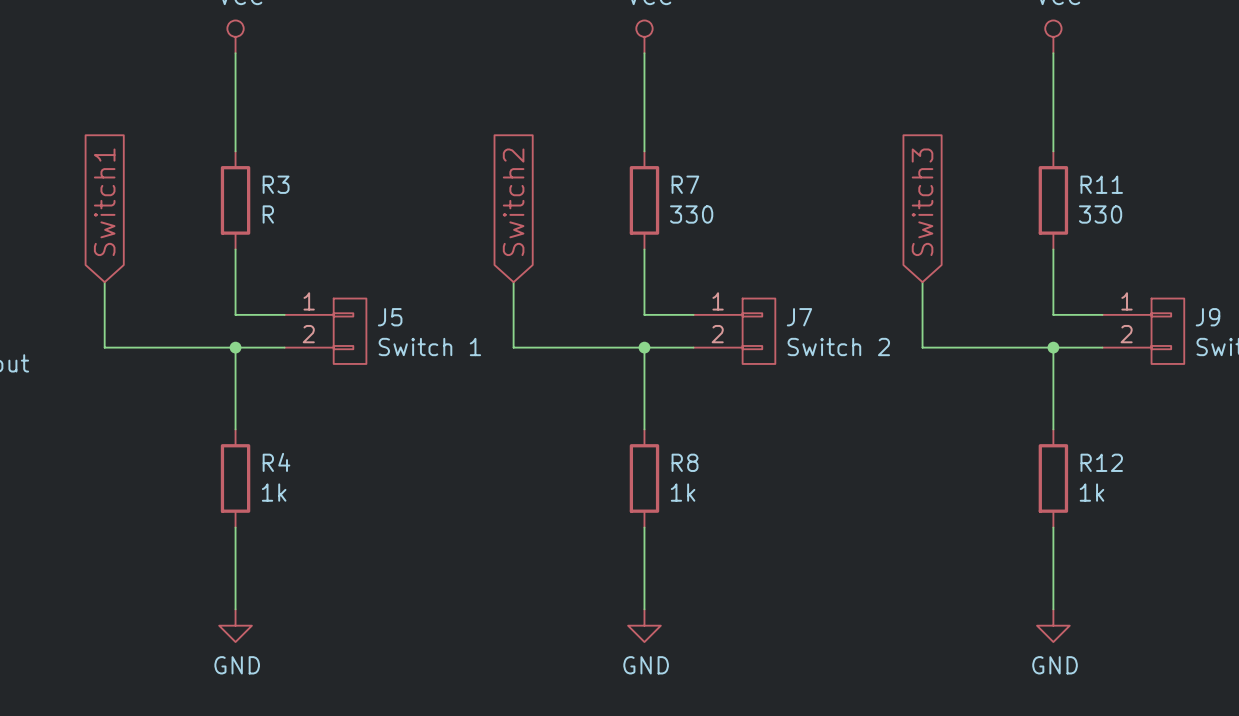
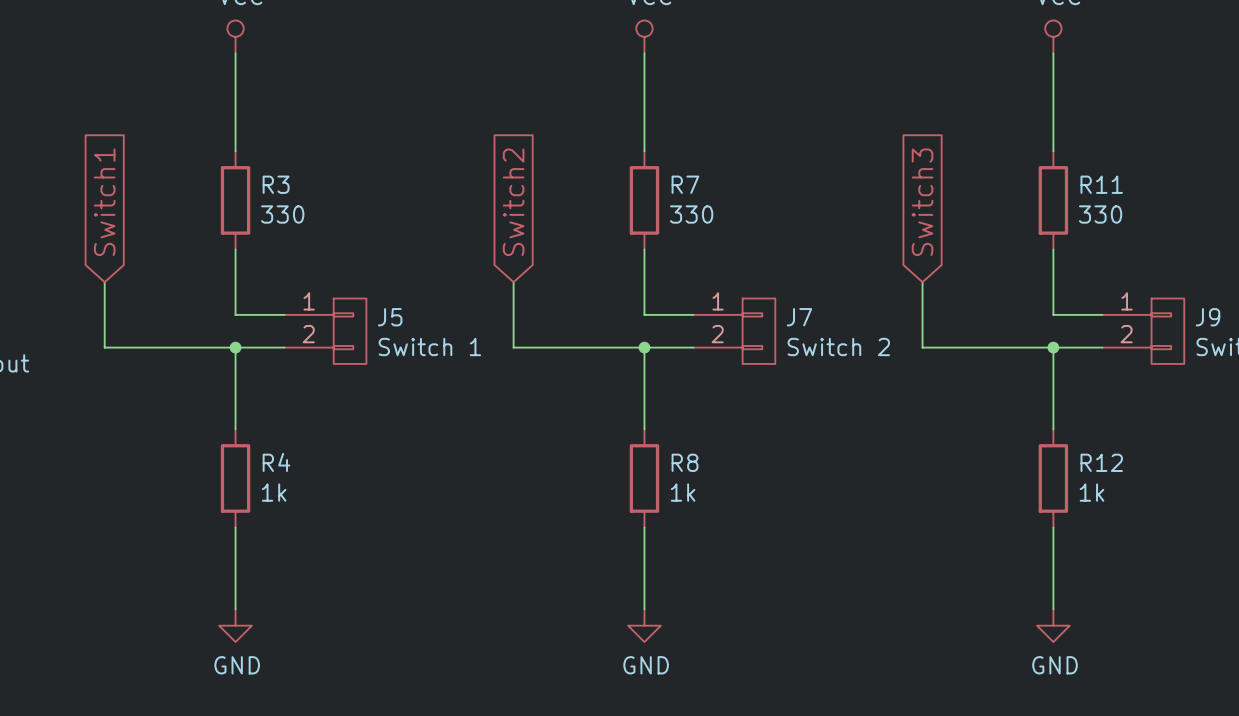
R3 value: R (268, 214) -> 330 (282, 214)

